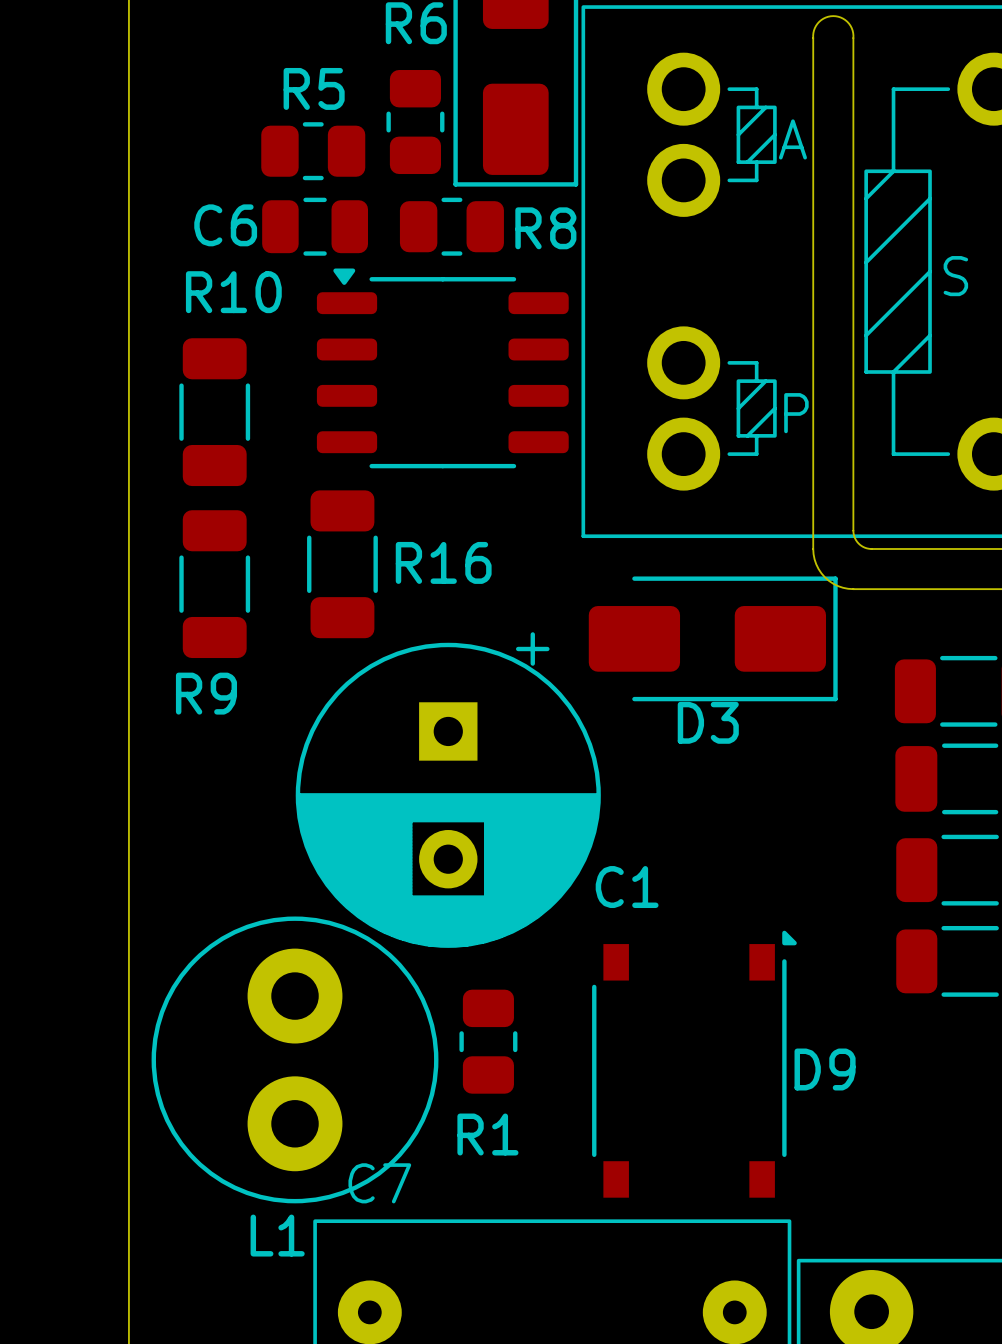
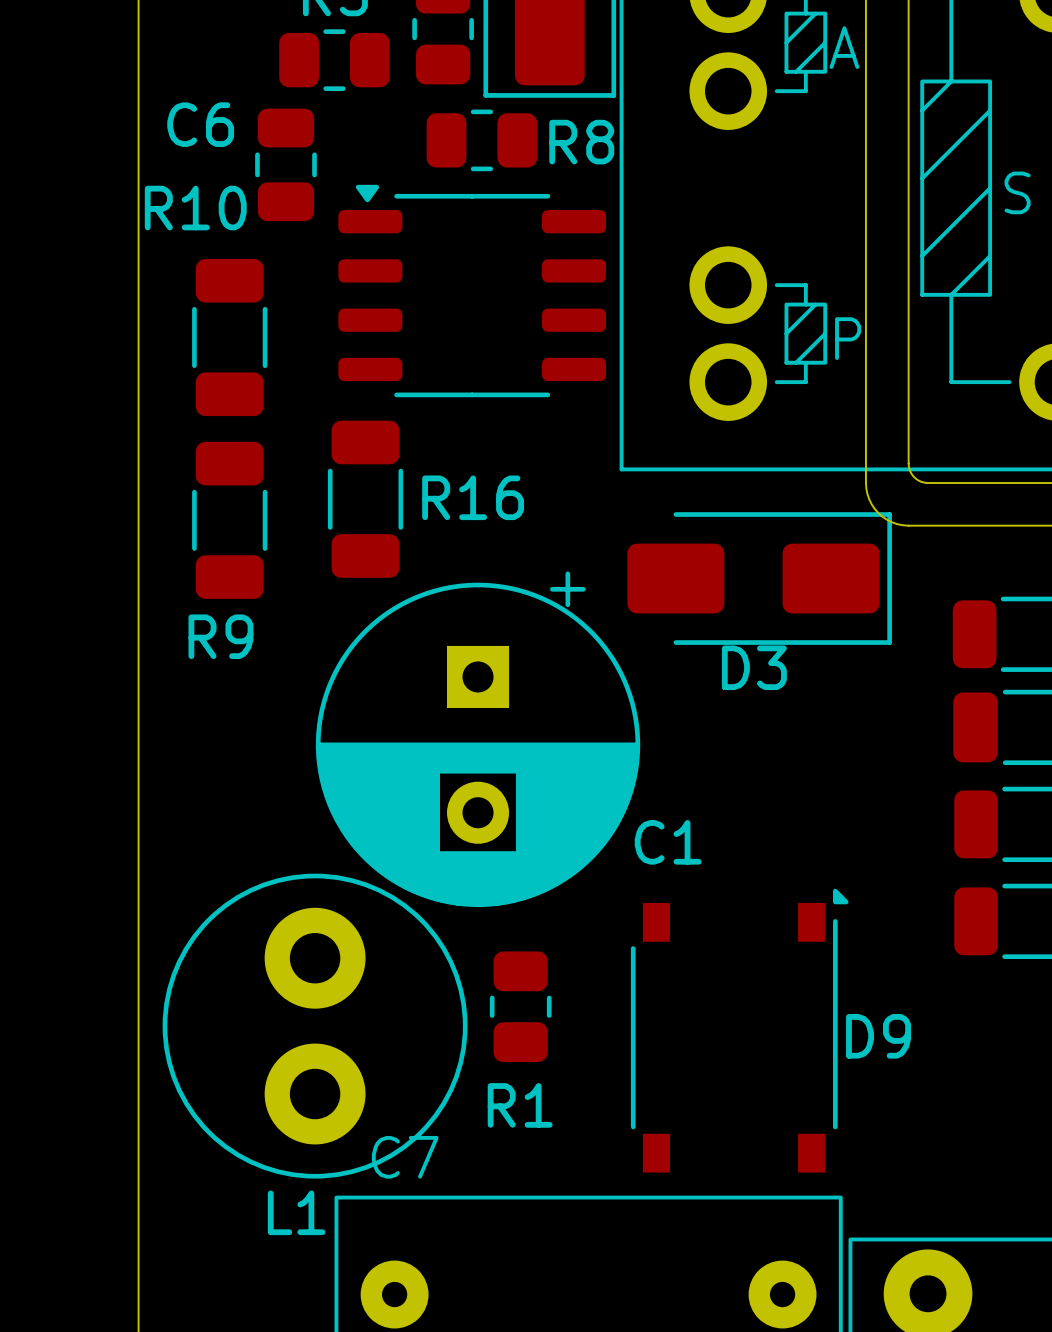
C6 rotation: 0° (315, 226) -> 90° clockwise (285, 164)
R10 name position: R10 (233, 292) -> R10 (195, 208)

